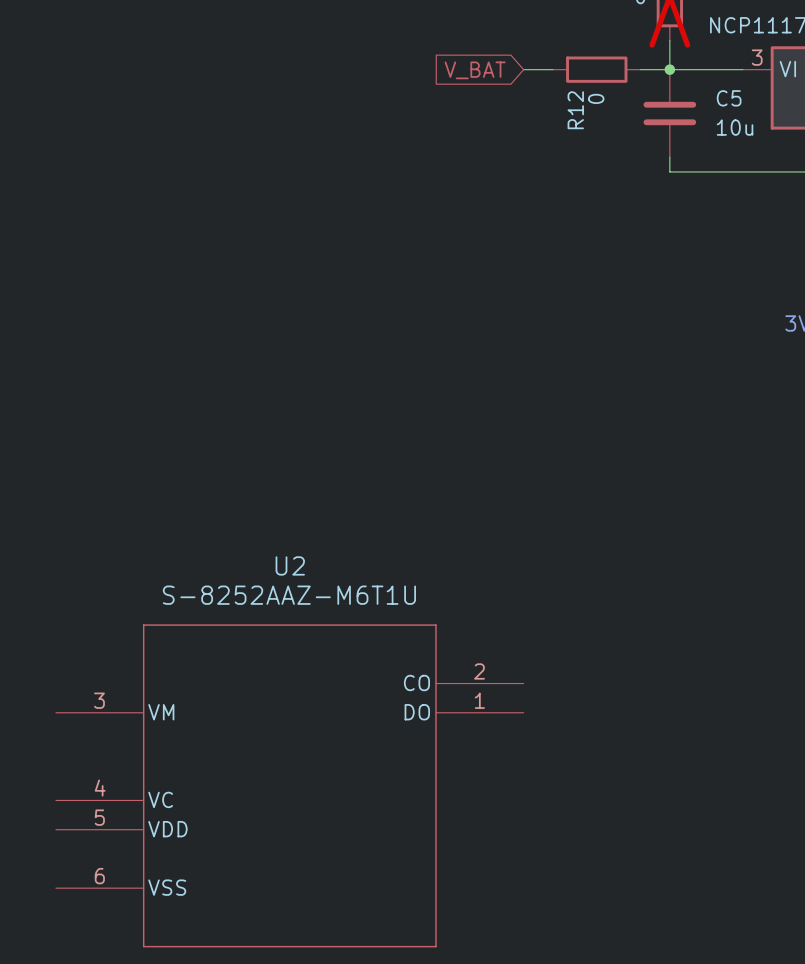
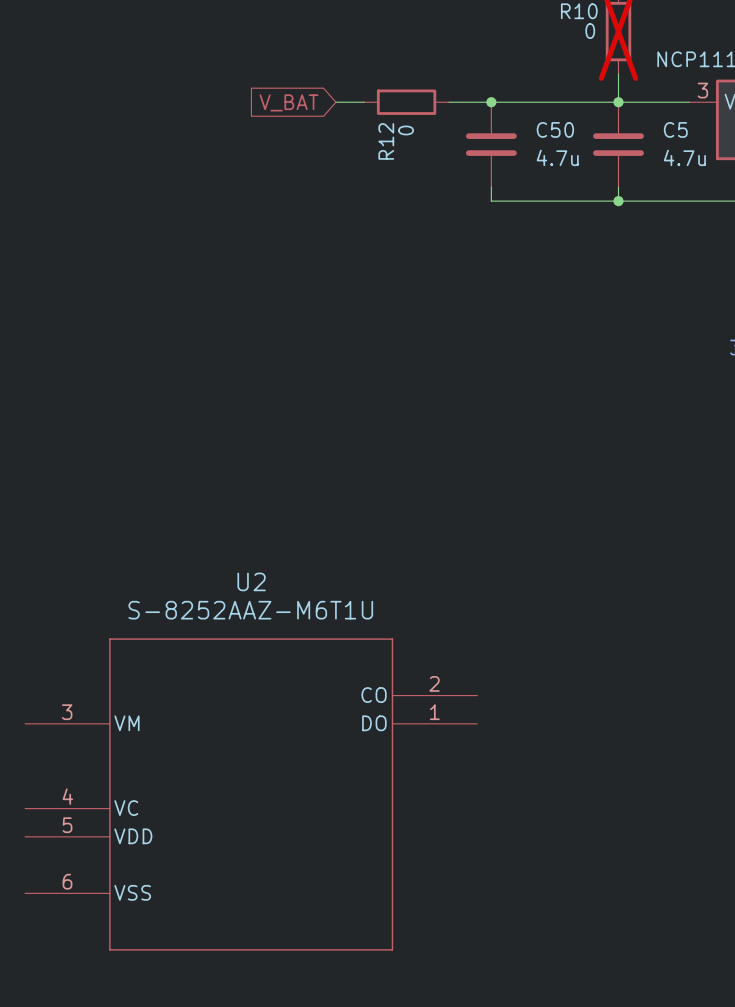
wire: none -> (335, 102) (364, 102)
wire: none -> (448, 102) (477, 102)
junction: none -> (491, 102)
wire: none -> (505, 102) (590, 102)
R12 position: (596, 69) -> (406, 102)
global label position: V_BAT (475, 70) -> V_BAT (289, 102)
C50: none -> 4.7u (491, 144)
C5 value: 10u (735, 127) -> 4.7u (684, 157)
wire: none -> (491, 186) (491, 201) (618, 201)
junction: none -> (618, 201)

